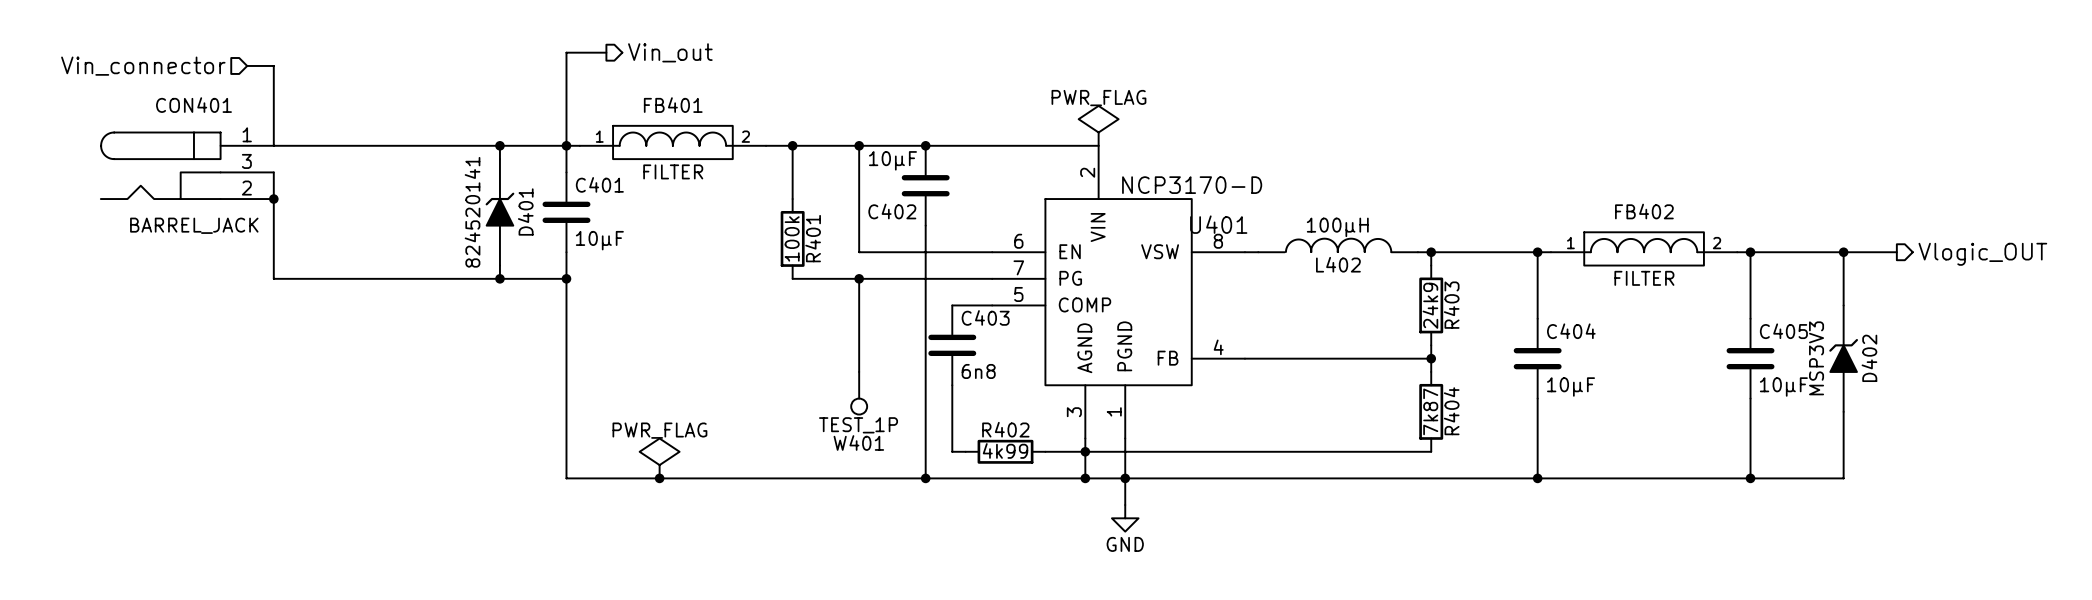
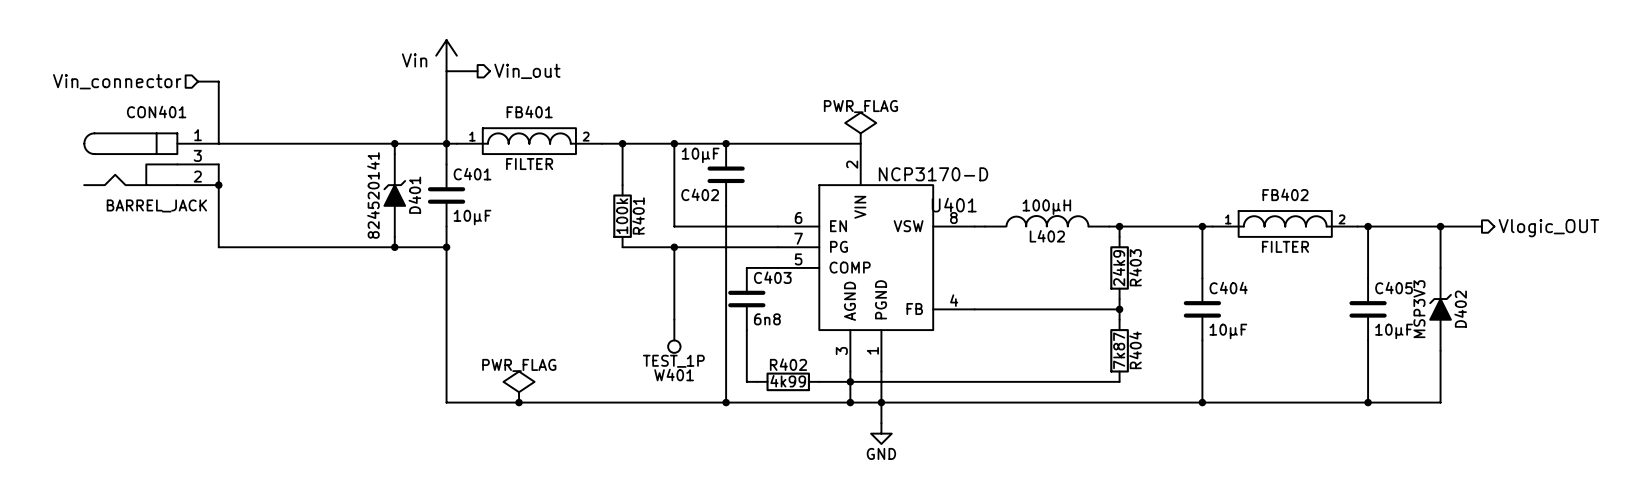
power symbol: none -> Vin (446, 55)

